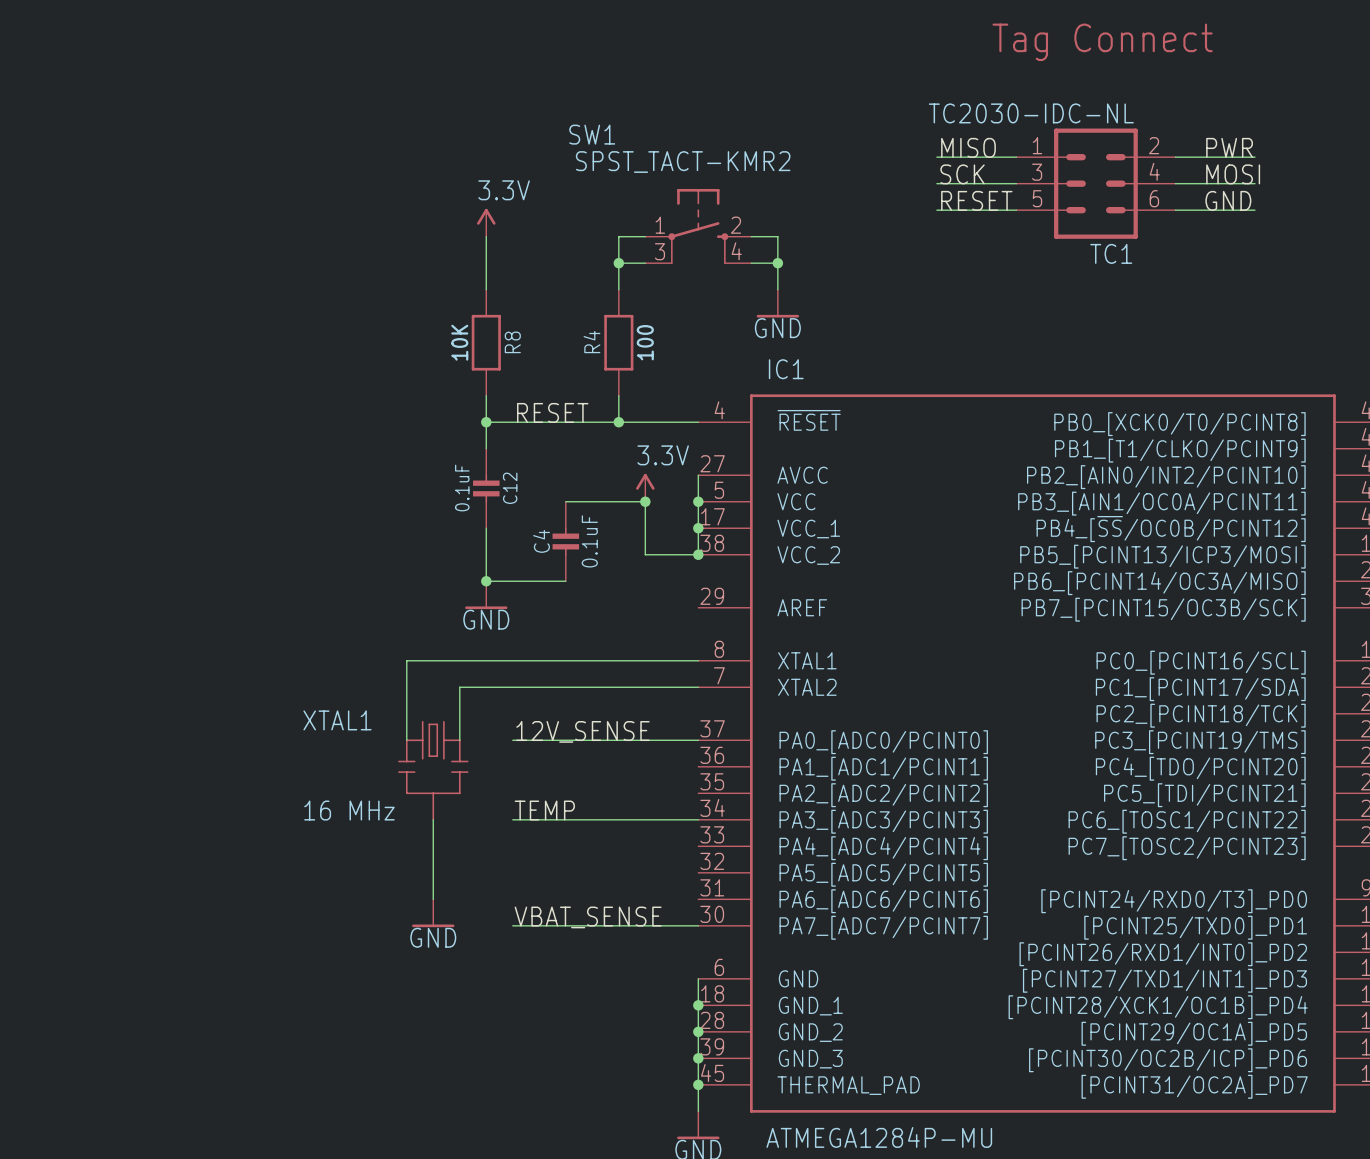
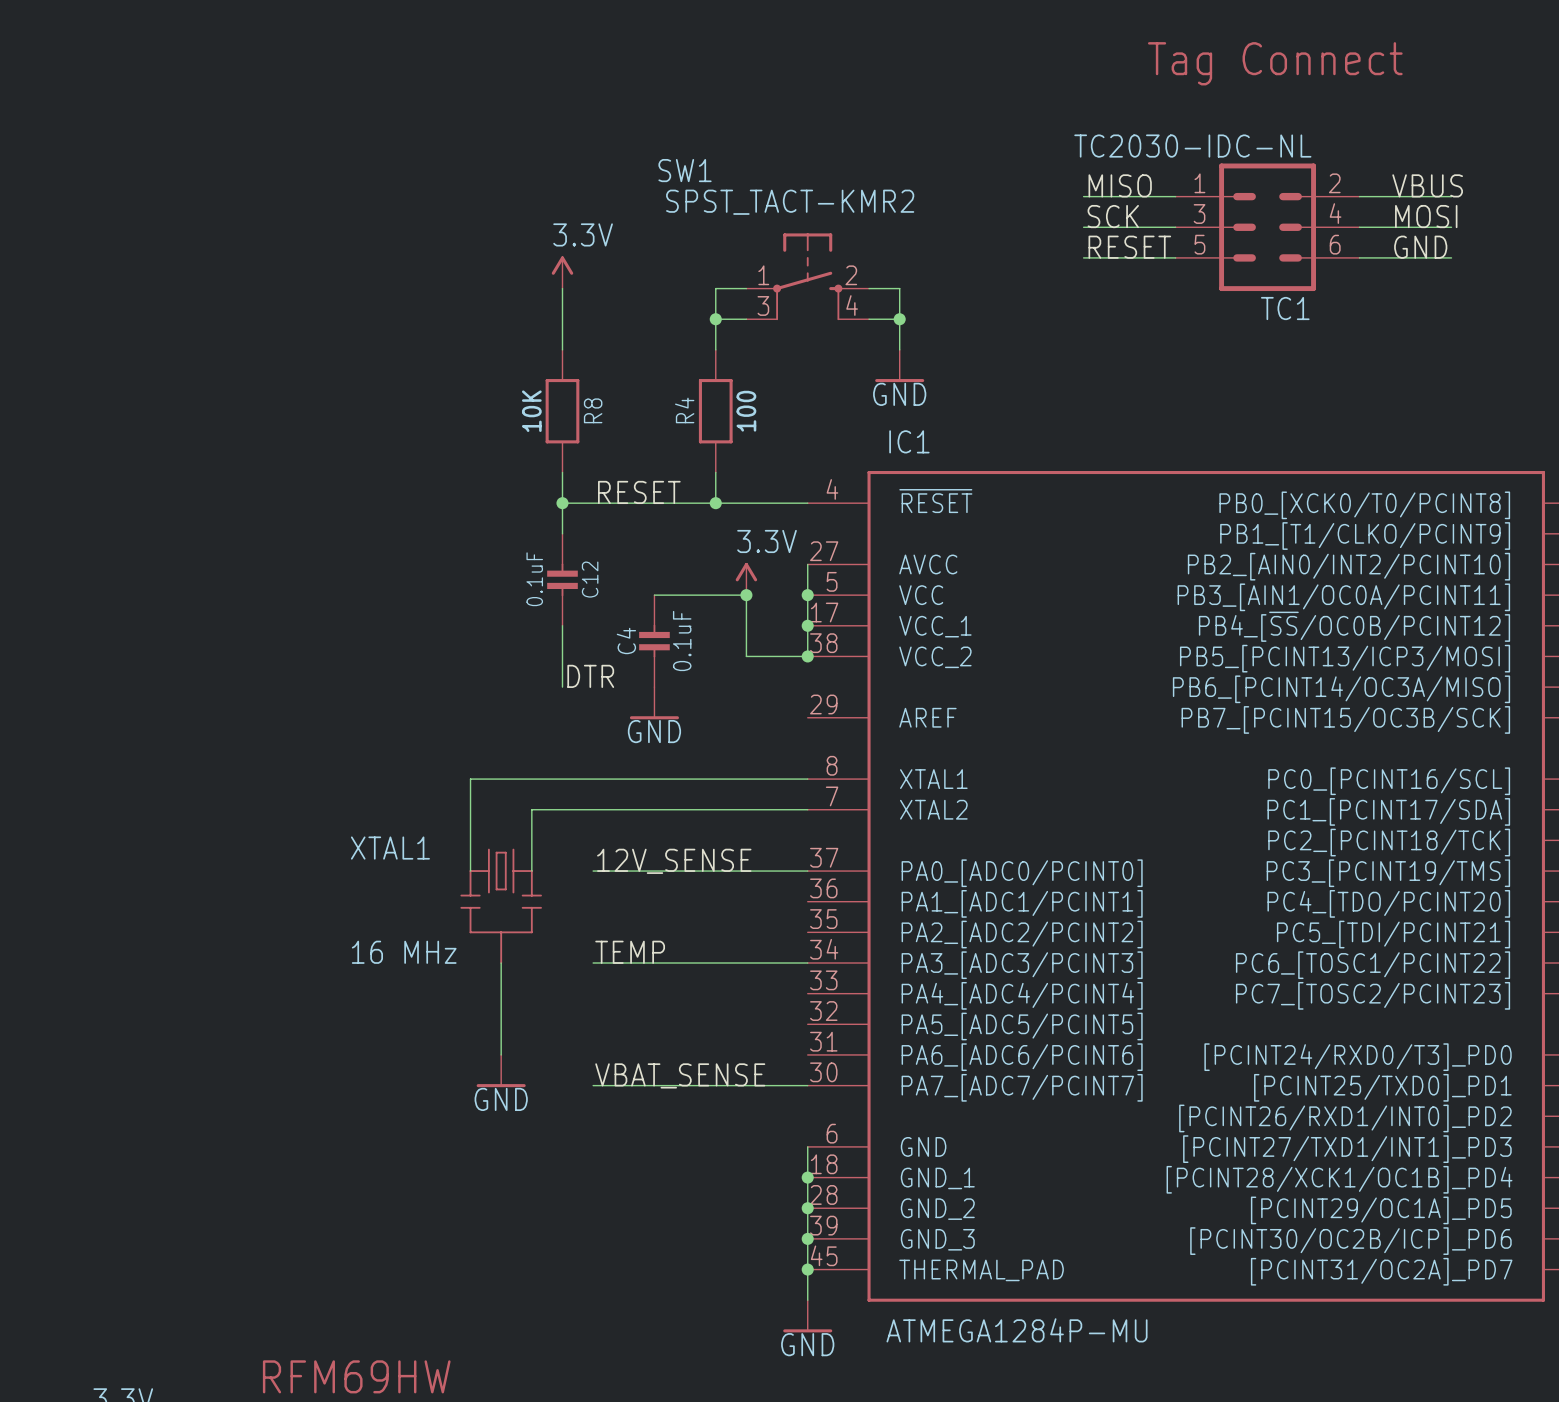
label: PWR (1229, 147) -> VBUS (1427, 185)
label: none -> DTR (590, 676)
wire: (486, 581) (565, 581) -> none
junction: (486, 581) -> none
power symbol position: GND (486, 595) -> GND (654, 703)

